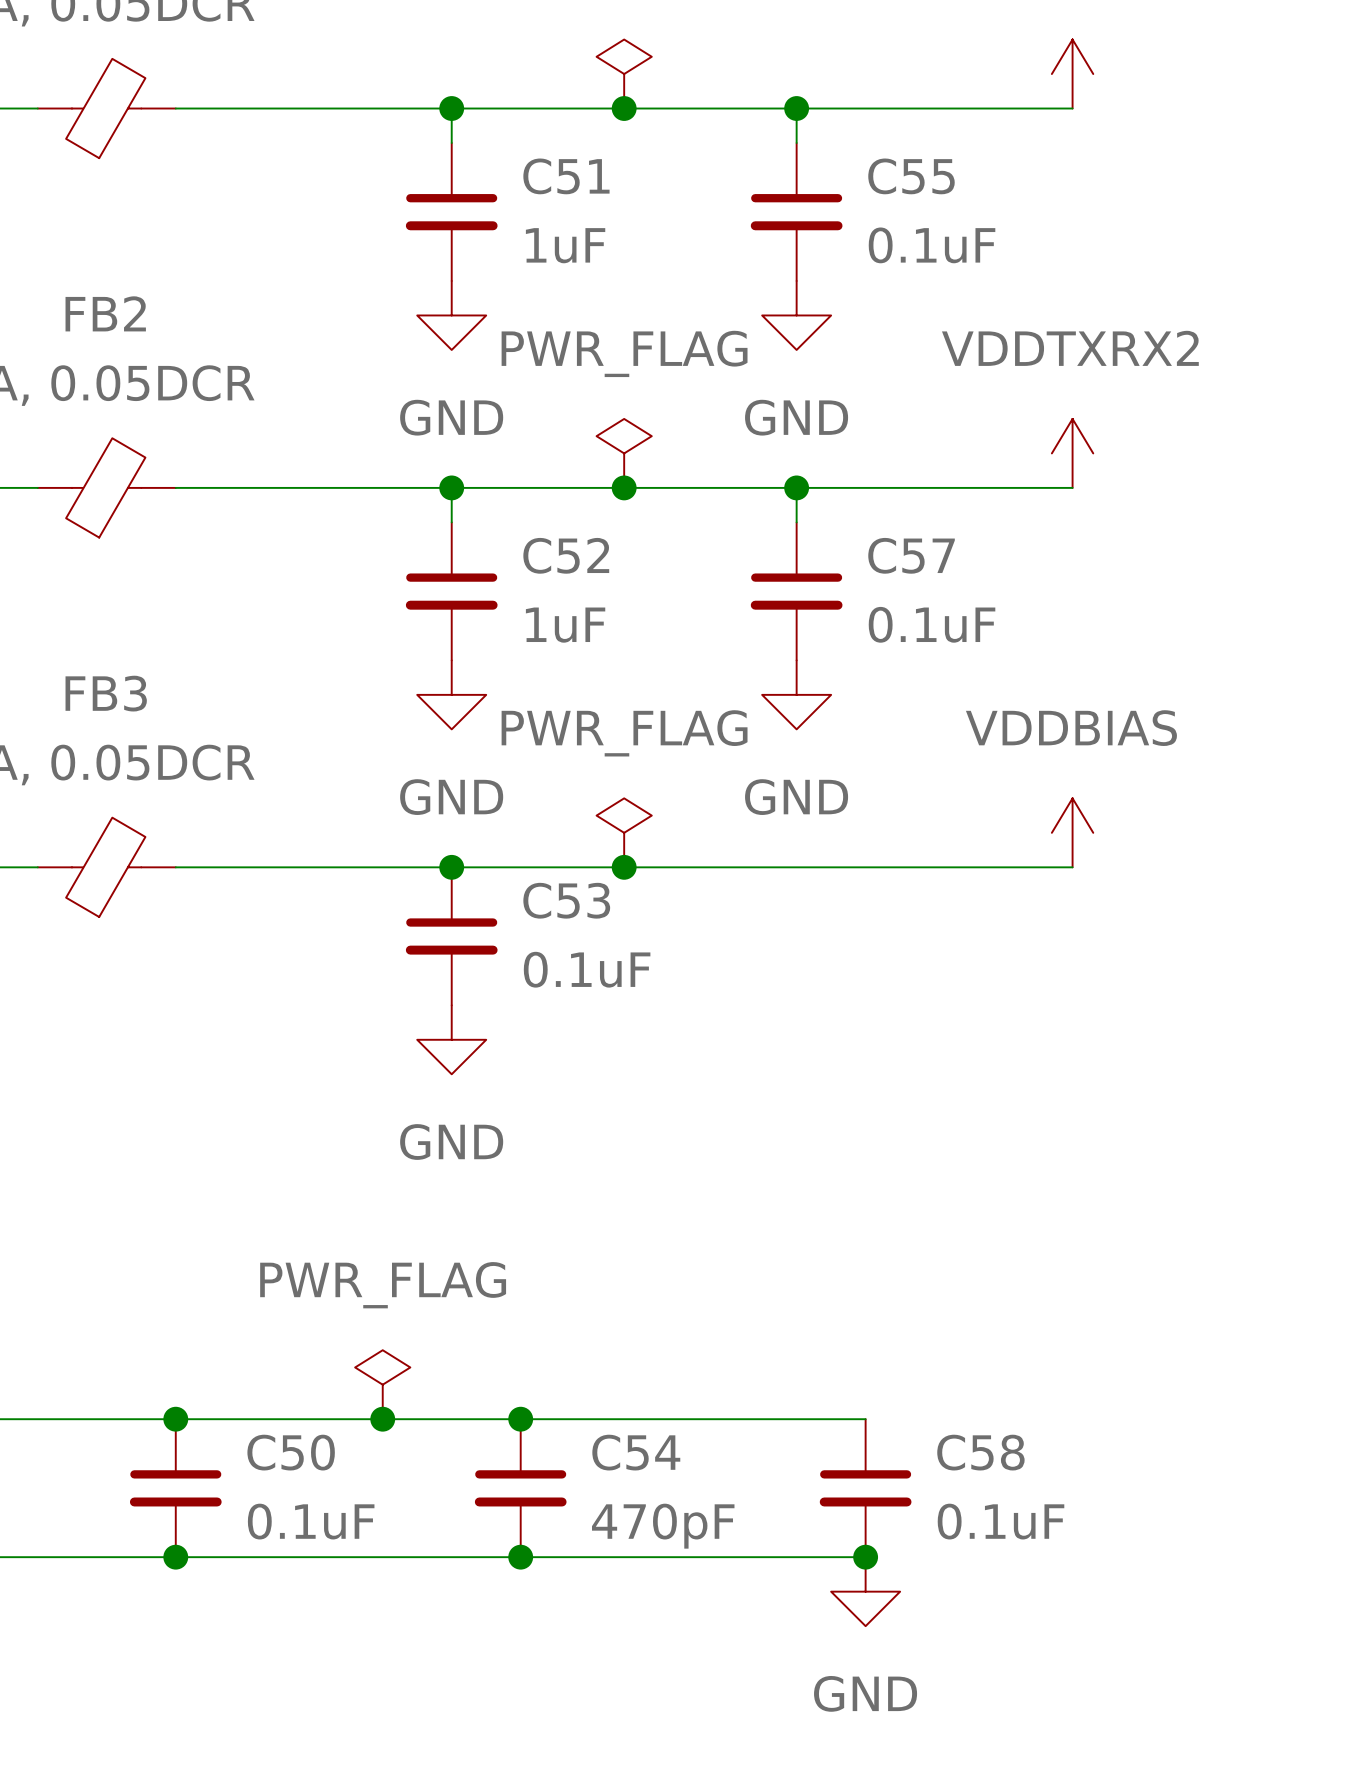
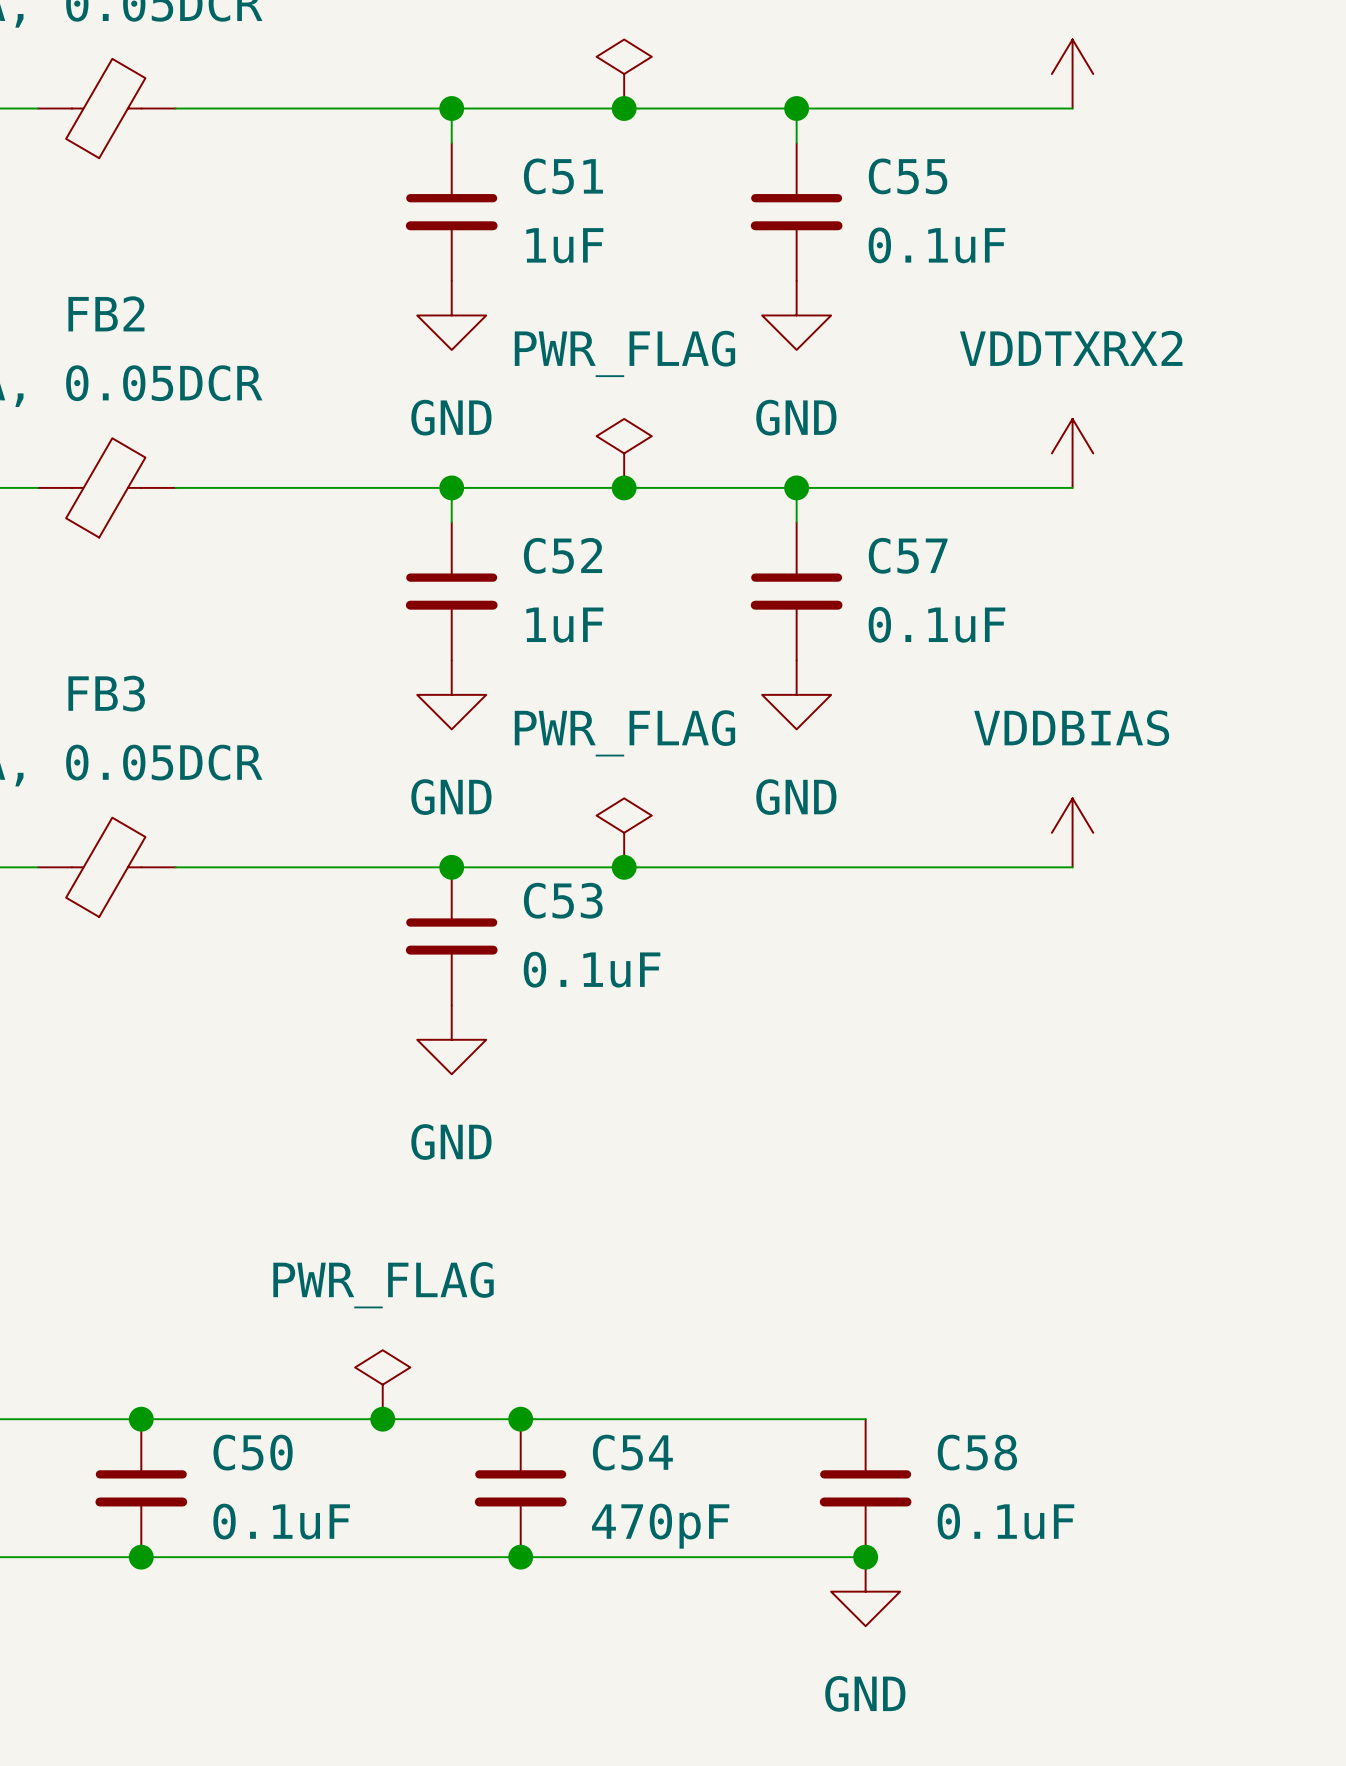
junction position: (175, 1419) -> (141, 1419)
C50 position: (175, 1488) -> (141, 1488)
junction position: (175, 1557) -> (141, 1557)

